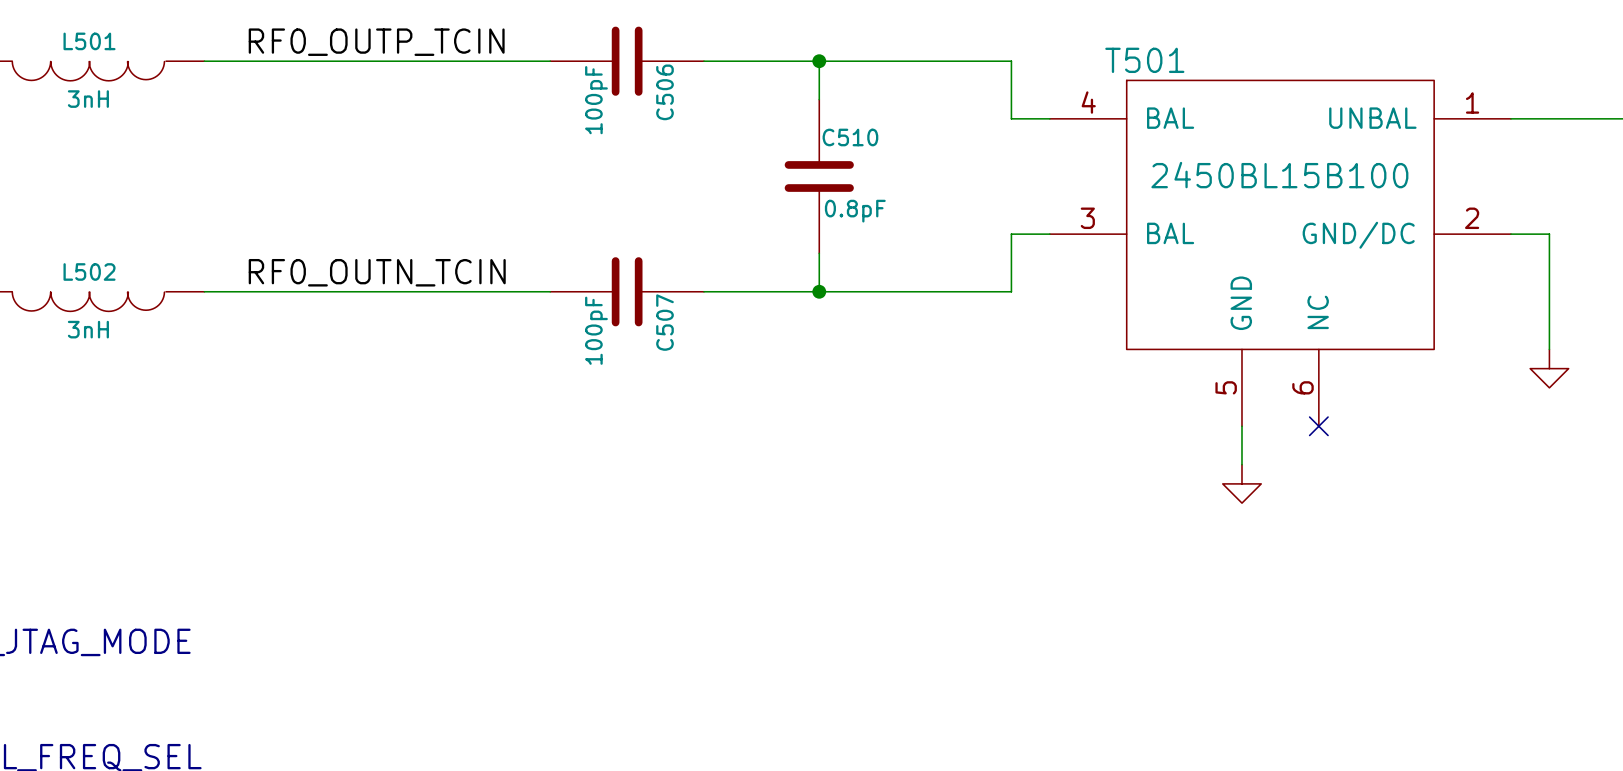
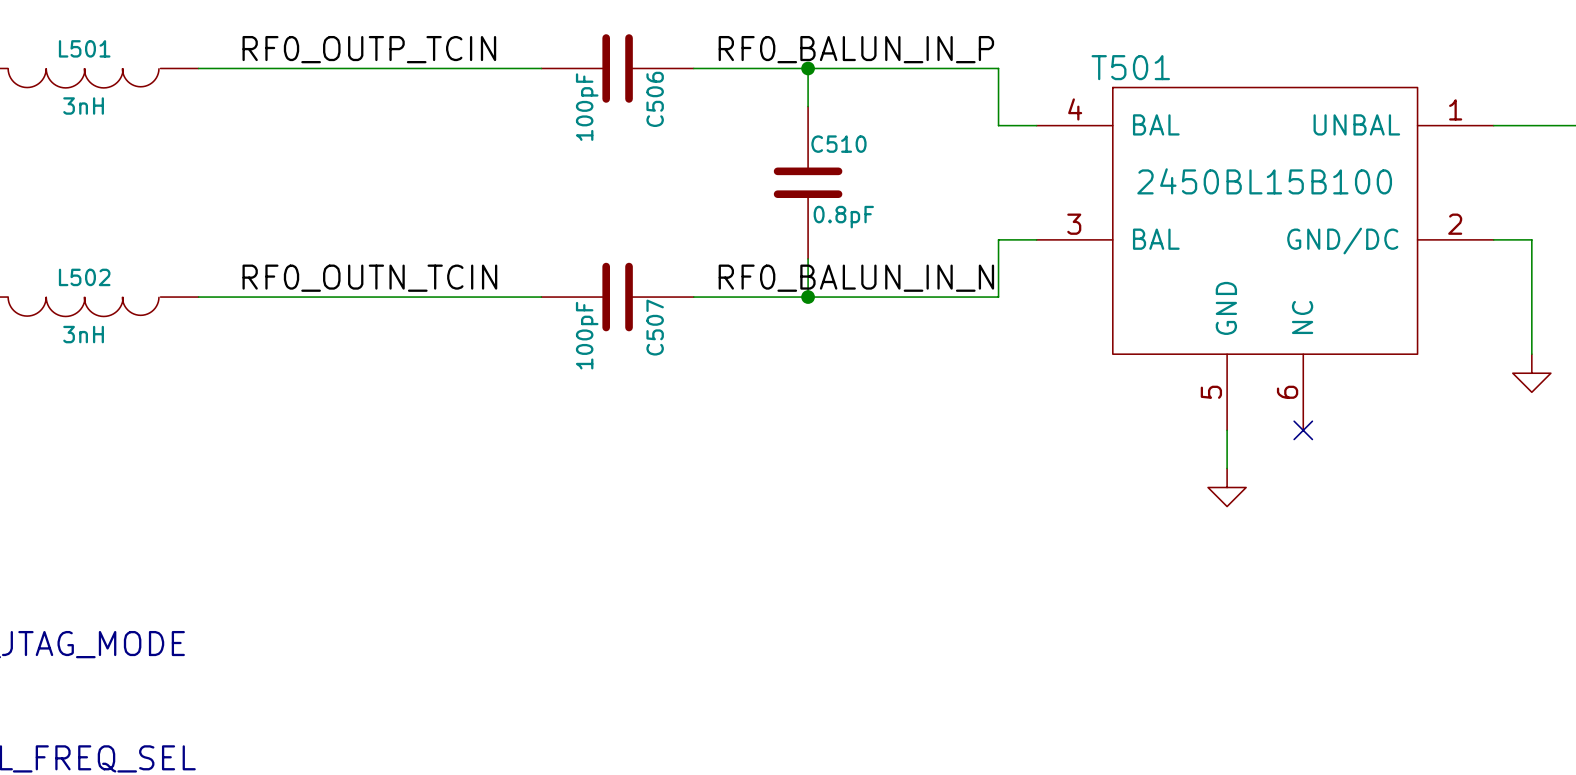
label: none -> RF0_BALUN_IN_P (856, 49)
label: none -> RF0_BALUN_IN_N (856, 278)

